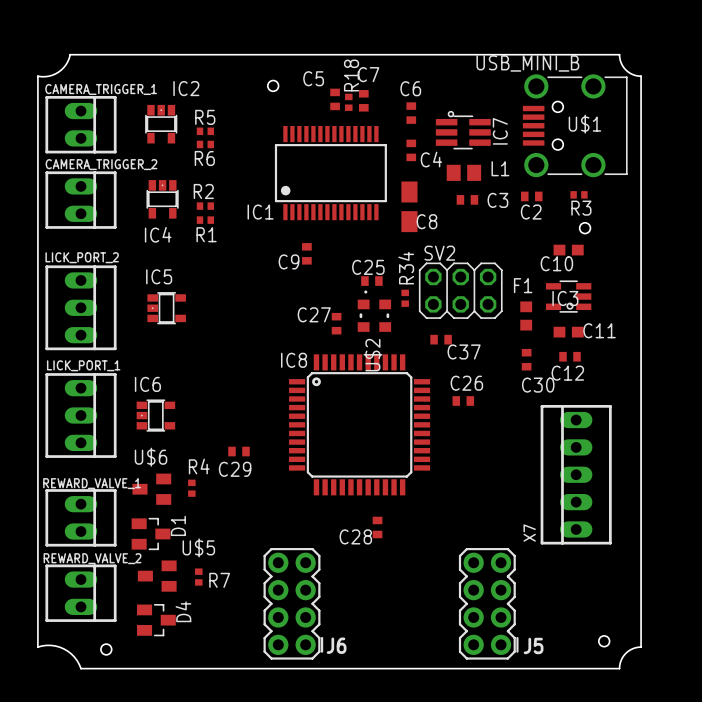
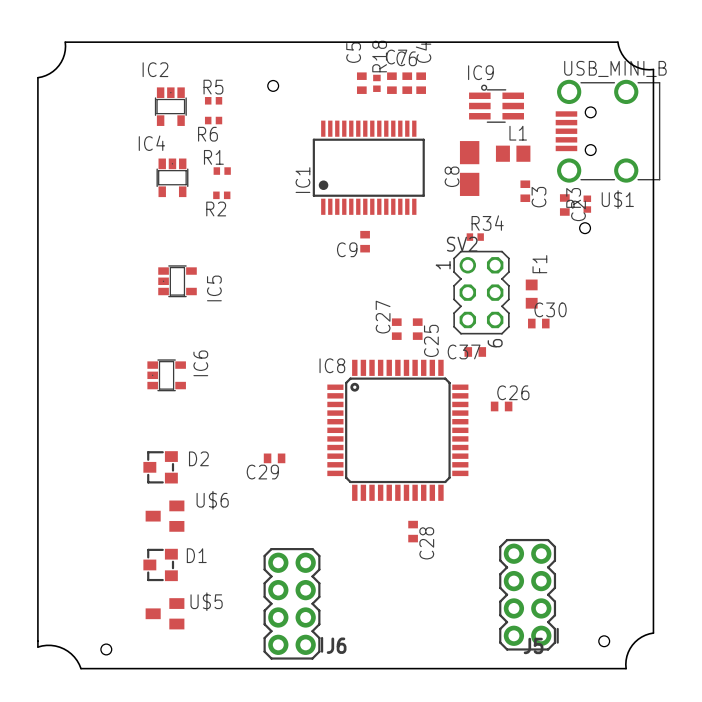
U$1 value position: USB_MINI_B (527, 63) -> USB_MINI_B (615, 68)
board edge: (37, 77) (58, 72) (66, 64) (70, 54) (619, 54) (621, 62) (625, 69) (632, 74) (641, 76) (641, 647) (632, 648) (625, 653) (621, 660) (619, 668) -> (37, 77) (49, 73) (58, 65) (64, 54) (65, 42) (617, 42) (621, 53) (630, 63) (641, 68) (653, 69) (653, 633) (645, 635) (635, 642) (626, 656) (626, 668) (619, 668)
C5 name rotation: 0° (313, 78) -> 90° counterclockwise (353, 52)
IC2 name position: IC2 (186, 88) -> IC2 (155, 69)
C5 position: (335, 99) -> (361, 83)
C7 position: (363, 100) -> (391, 83)
R18 position: (348, 102) -> (376, 83)
IC9: none -> (496, 103)
C6 position: (411, 113) -> (407, 83)
R5 name position: R5 (205, 117) -> R5 (213, 87)
CAMERA_TRIGGER_1: (81, 124) -> none
IC2 position: (161, 124) -> (170, 106)
U$1 name position: U$1 (584, 124) -> U$1 (617, 199)
U$1 position: (575, 125) -> (608, 131)
IC7: (463, 130) -> none
R6 position: (205, 131) -> (213, 120)
R5 position: (205, 144) -> (213, 100)
C4 position: (411, 150) -> (421, 83)
R6 name position: R6 (204, 158) -> R6 (207, 134)
C4 name rotation: 0° (431, 159) -> 90° counterclockwise (423, 52)
C4 name position: C4 (431, 159) -> C4 (423, 52)
L1 name position: L1 (500, 168) -> L1 (518, 133)
L1 position: (463, 172) -> (513, 153)
IC1 position: (330, 173) -> (368, 167)
C8 footprint: [401, 181, 418, 233] -> [459, 141, 480, 196]
R2 name position: R2 (203, 191) -> R2 (216, 209)
R3 rotation: 0° (579, 194) -> 90° clockwise (587, 204)
R3 position: (579, 194) -> (587, 204)
C2 rotation: 0° (531, 196) -> 90° clockwise (564, 205)
C2 position: (531, 196) -> (564, 205)
IC4 position: (162, 199) -> (172, 177)
C3 rotation: 0° (467, 199) -> 90° clockwise (525, 191)
C3 position: (467, 199) -> (525, 191)
CAMERA_TRIGGER_2: (81, 200) -> none
R2 position: (205, 206) -> (221, 195)
IC1 name rotation: 0° (260, 212) -> 90° counterclockwise (302, 180)
R1 position: (205, 220) -> (222, 171)
C8 name position: C8 (426, 221) -> C8 (452, 176)
IC4 name position: IC4 (158, 234) -> IC4 (151, 143)
R1 name position: R1 (206, 234) -> R1 (213, 157)
C10: (568, 250) -> none
C9 position: (306, 253) -> (365, 241)
SV2 footprint: [418, 262, 503, 319] -> [453, 250, 510, 335]
R34 name position: R34 (406, 268) -> R34 (487, 223)
IC5 name rotation: 0° (159, 276) -> 90° counterclockwise (214, 288)
IC5 name position: IC5 (159, 276) -> IC5 (214, 288)
C25 rotation: 0° (371, 281) -> 90° clockwise (417, 329)
C25 position: (371, 281) -> (417, 329)
F1 name rotation: 0° (523, 285) -> 90° counterclockwise (539, 264)
IC3: (568, 296) -> none
R34 rotation: 0° (405, 298) -> 90° clockwise (475, 237)
R34 position: (405, 298) -> (475, 237)
LICK_PORT_2: (81, 307) -> none
IC5 position: (166, 308) -> (177, 281)
U$2: (374, 311) -> none
C27 name rotation: 0° (314, 314) -> 90° counterclockwise (383, 317)
F1 position: (526, 315) -> (531, 294)
C27 position: (336, 323) -> (396, 329)
C11: (568, 332) -> none
C37 position: (441, 339) -> (475, 351)
C12: (570, 356) -> none
C30 rotation: 0° (526, 359) -> 90° clockwise (538, 323)
C30 position: (526, 359) -> (538, 323)
C26 name position: C26 (466, 383) -> C26 (513, 392)
IC6 name rotation: 0° (147, 384) -> 90° counterclockwise (200, 363)
IC6 name position: IC6 (147, 384) -> IC6 (200, 363)
C30 name position: C30 (538, 385) -> C30 (550, 309)
C26 position: (463, 401) -> (501, 406)
LICK_PORT_1: (81, 415) -> none
IC6 position: (155, 415) -> (166, 375)
IC8 position: (359, 424) -> (397, 430)
C29 position: (239, 451) -> (274, 458)
U$6 name position: U$6 (151, 457) -> U$6 (212, 500)
D2: none -> (160, 467)
C29 name position: C29 (235, 469) -> C29 (262, 472)
X7: (576, 474) -> none
R4: (191, 488) -> none
U$6 position: (151, 489) -> (165, 516)
REWARD_VALVE_1: (81, 517) -> none
D1 footprint: [131, 517, 171, 551] -> [143, 548, 178, 582]
C28 position: (377, 527) -> (413, 531)
C28 name rotation: 0° (355, 536) -> 90° counterclockwise (426, 543)
U$5 name position: U$5 (198, 547) -> U$5 (206, 601)
U$5 position: (157, 576) -> (165, 613)
R7: (198, 577) -> none
REWARD_VALVE_2: (81, 593) -> none
J5 position: (488, 603) -> (528, 594)
D4: (156, 620) -> none

